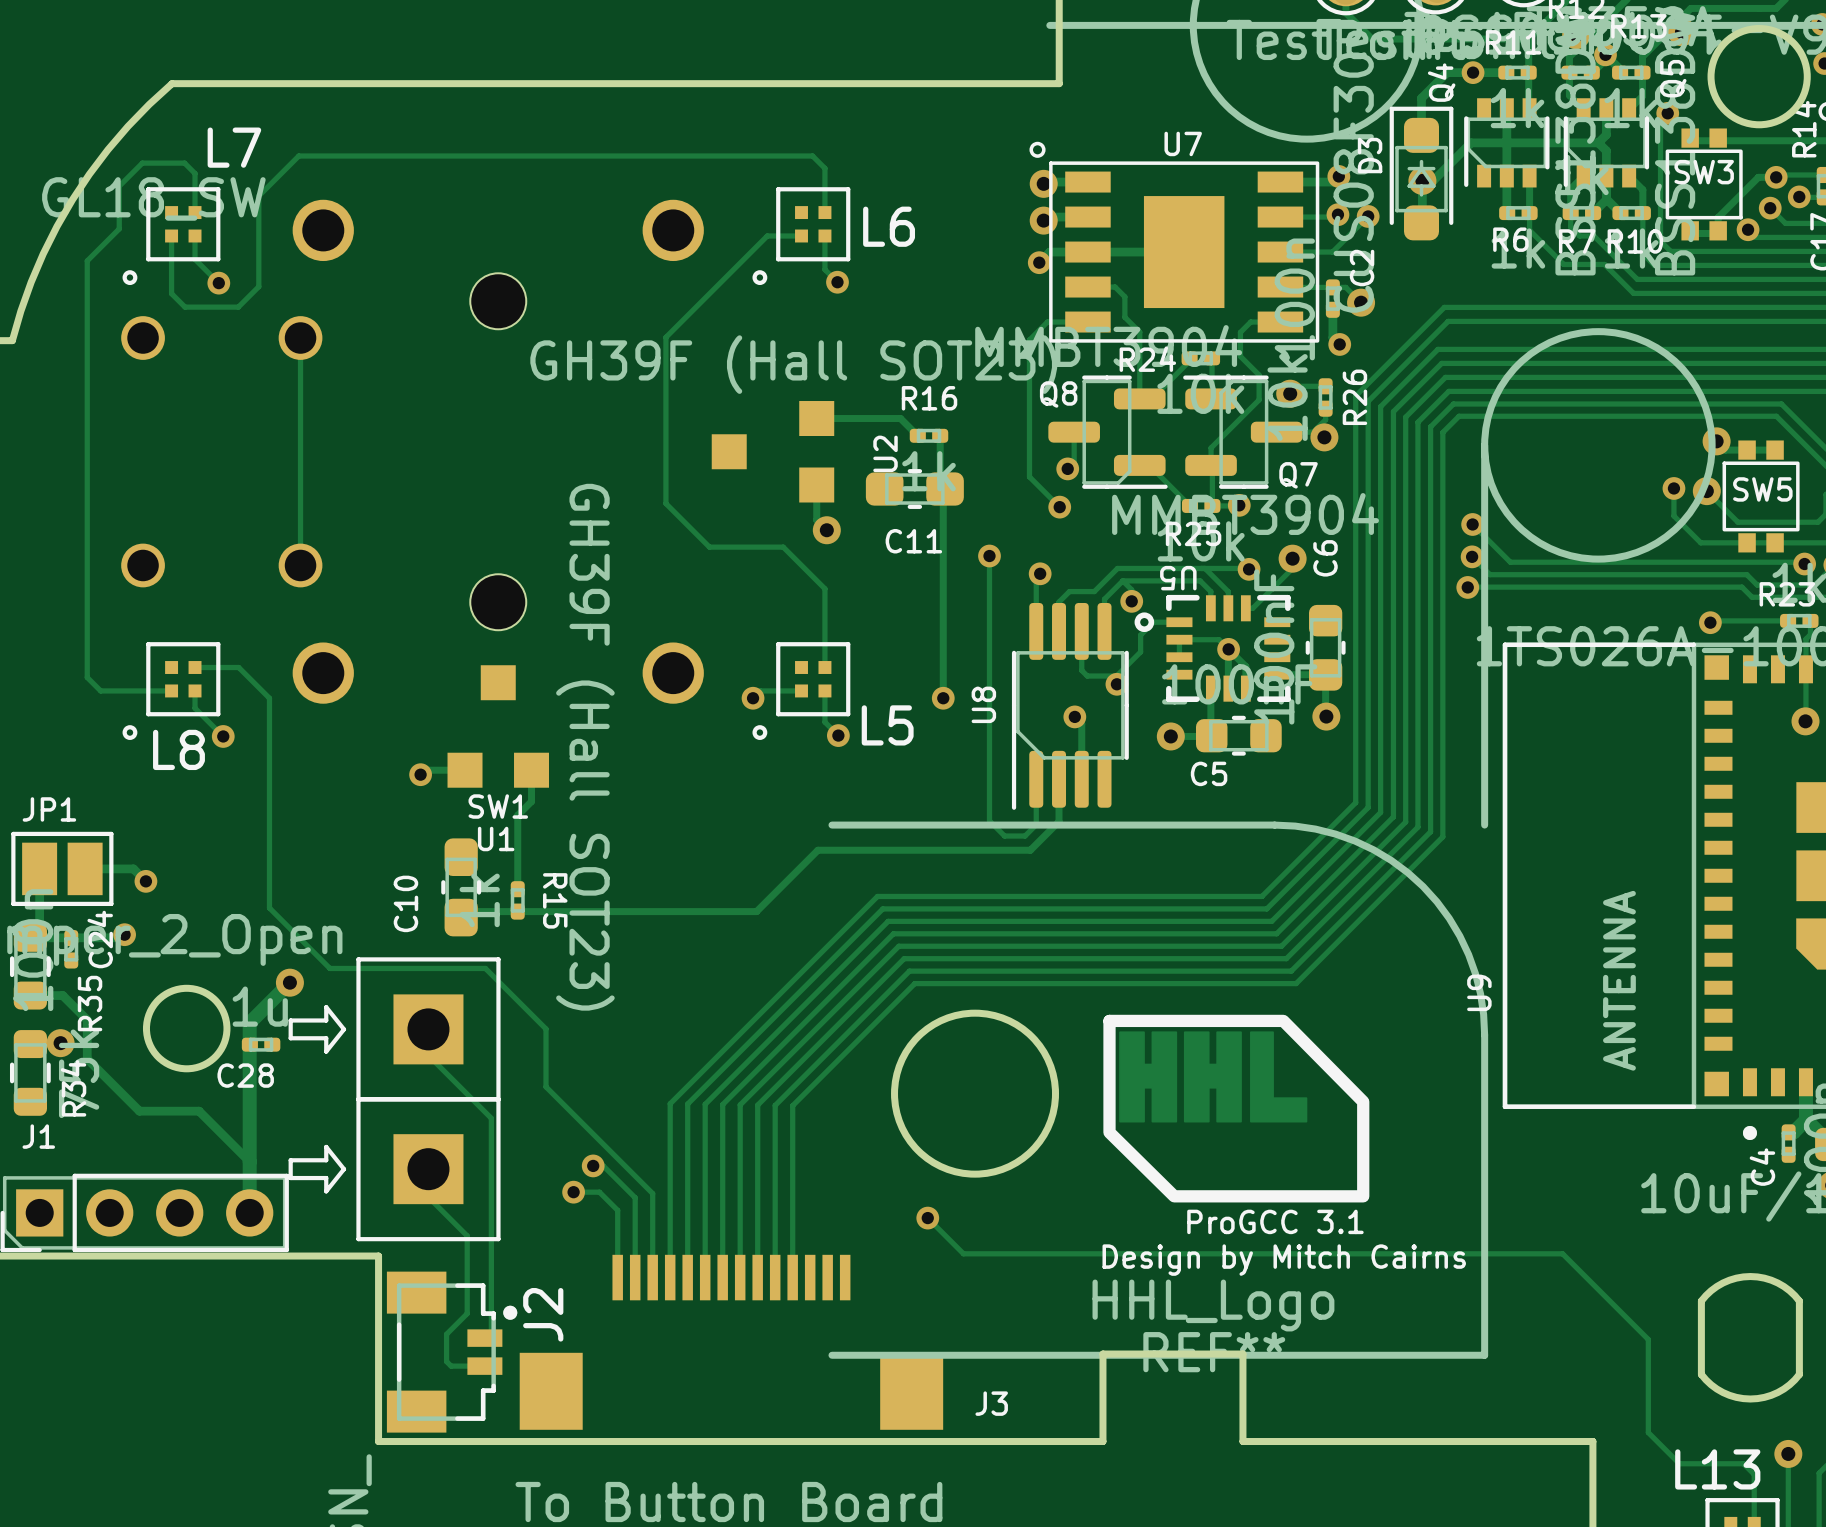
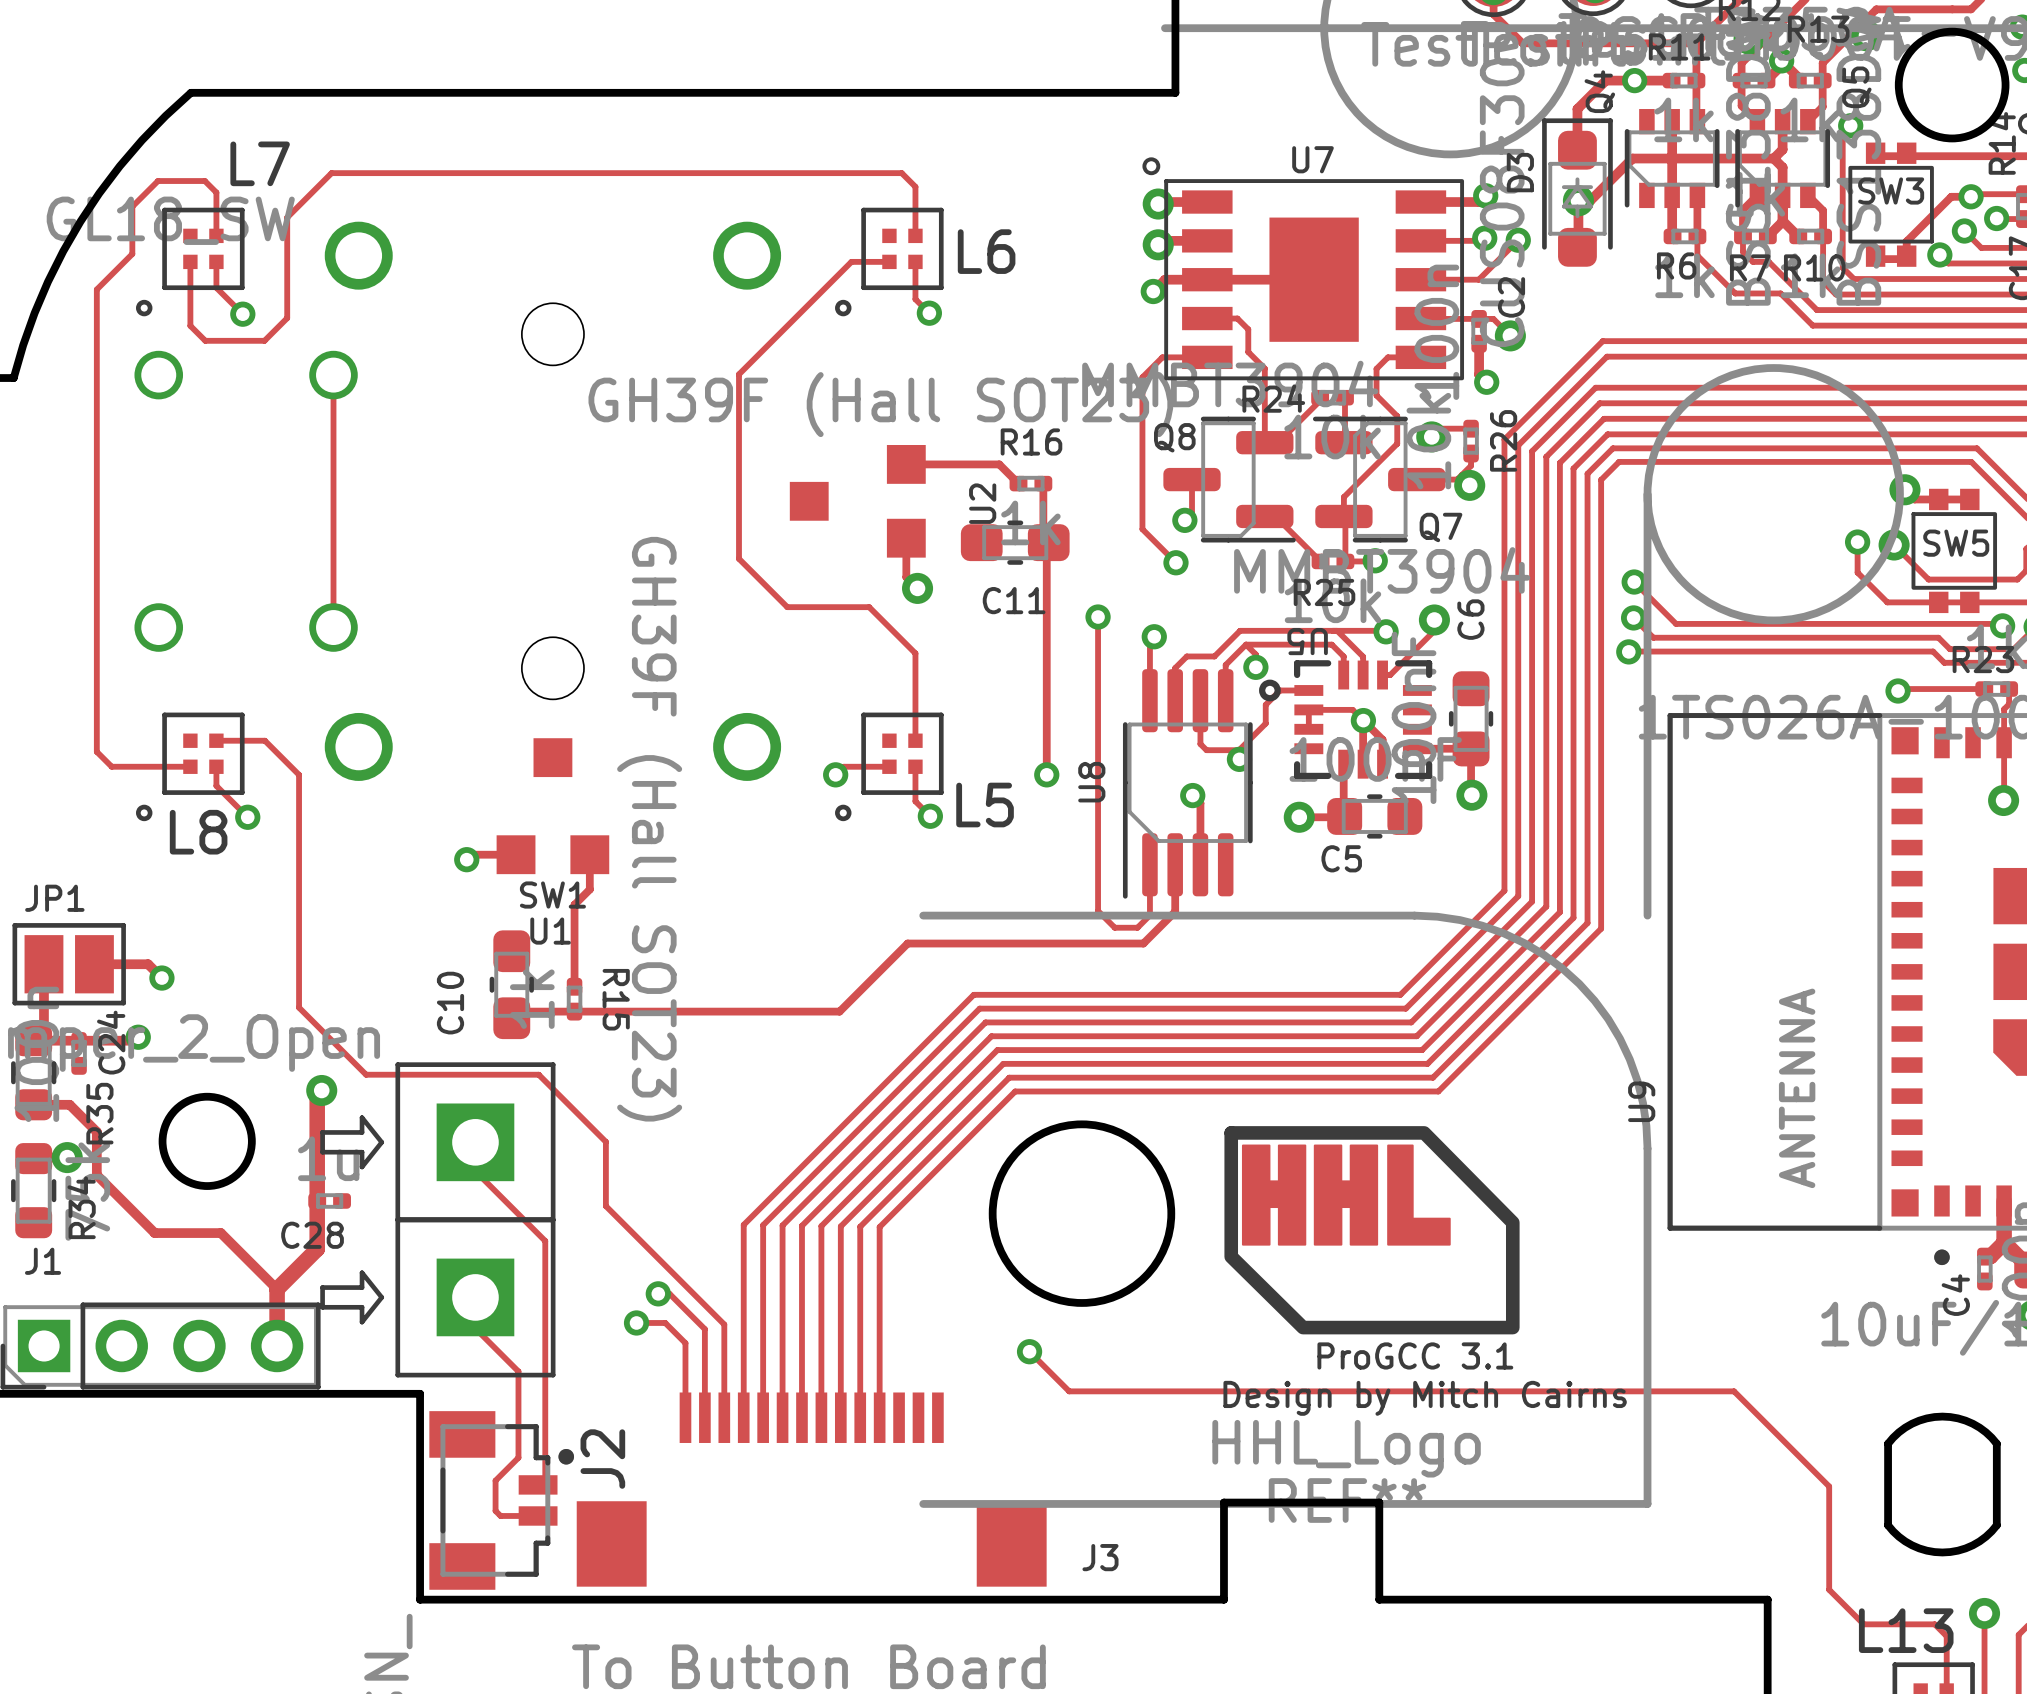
track: (285, 986) (249, 1022) (249, 1161) -> (317, 1095) (317, 1249) (277, 1289)
C28 position: (261, 1044) -> (329, 1200)

